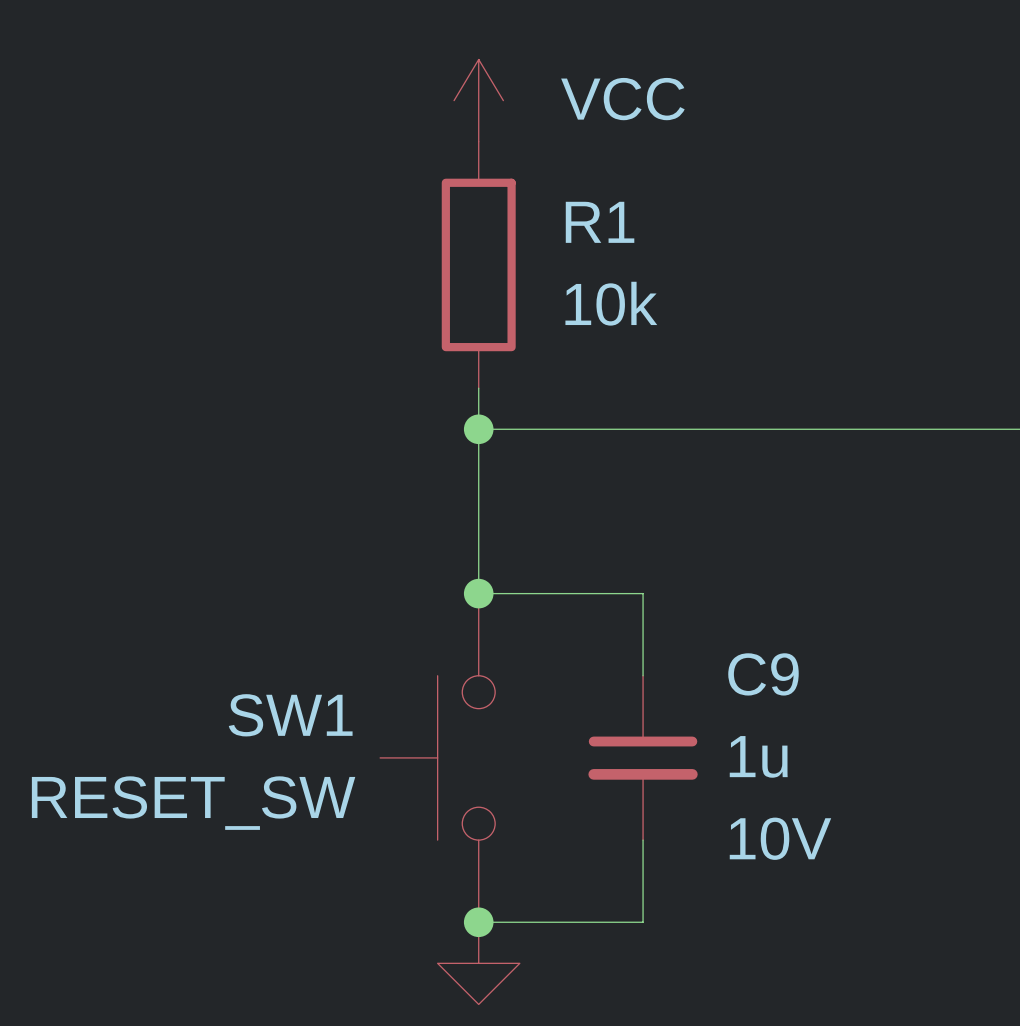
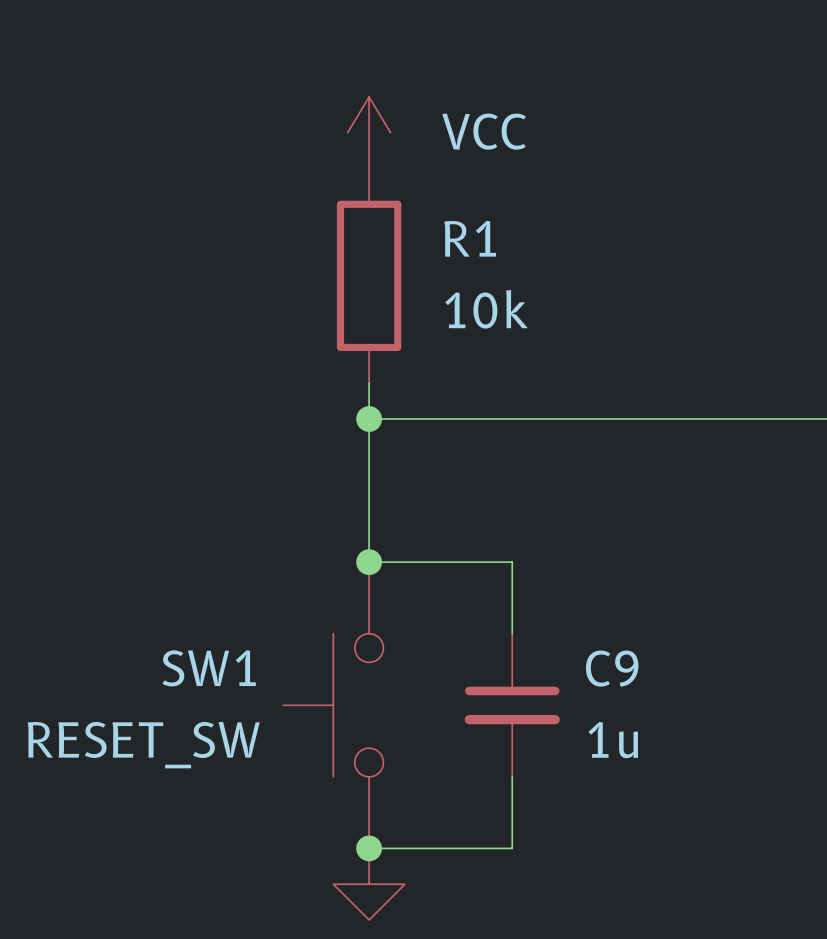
C9 name position: C9 (763, 674) -> C9 (612, 668)
C9 value position: 1u (758, 756) -> 1u (613, 740)
C9 text: 10V (780, 838) -> none

